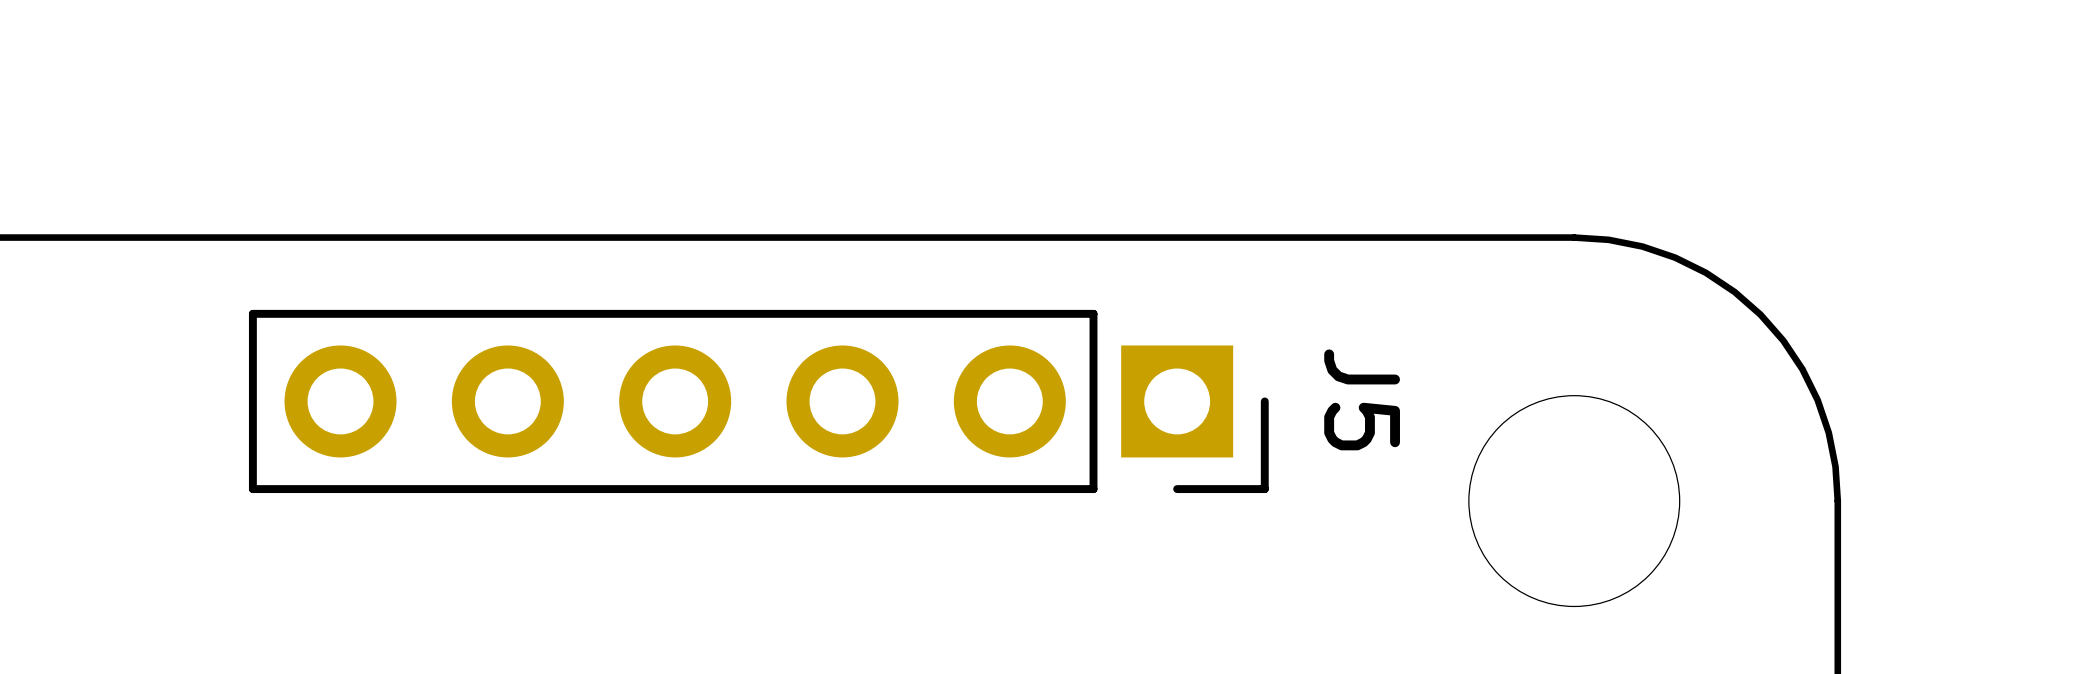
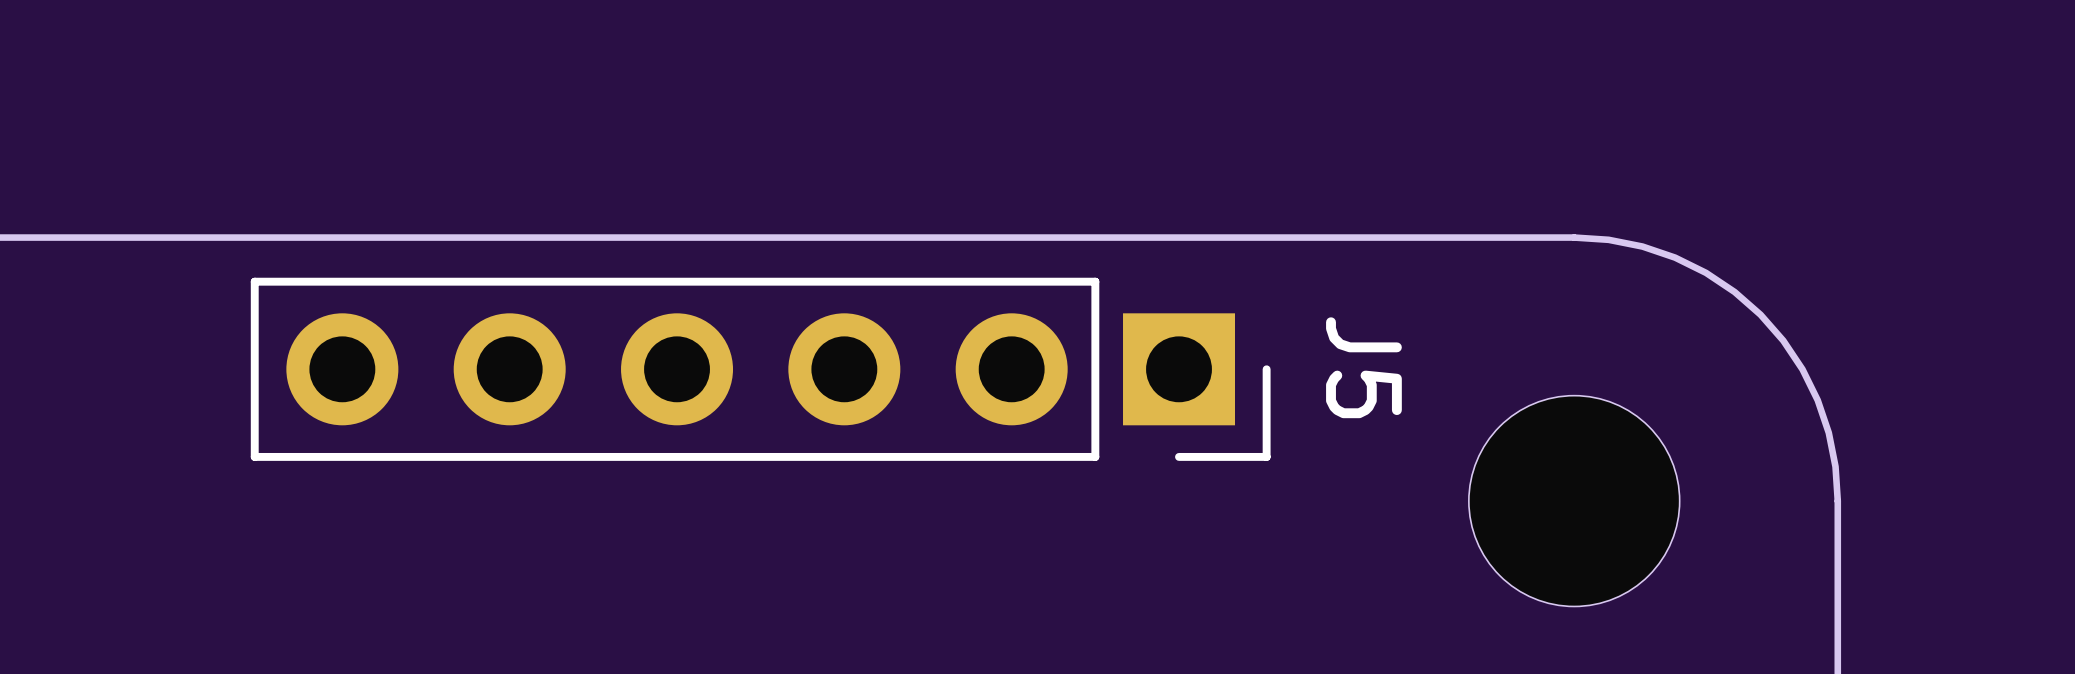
J5 position: (758, 401) -> (760, 369)

